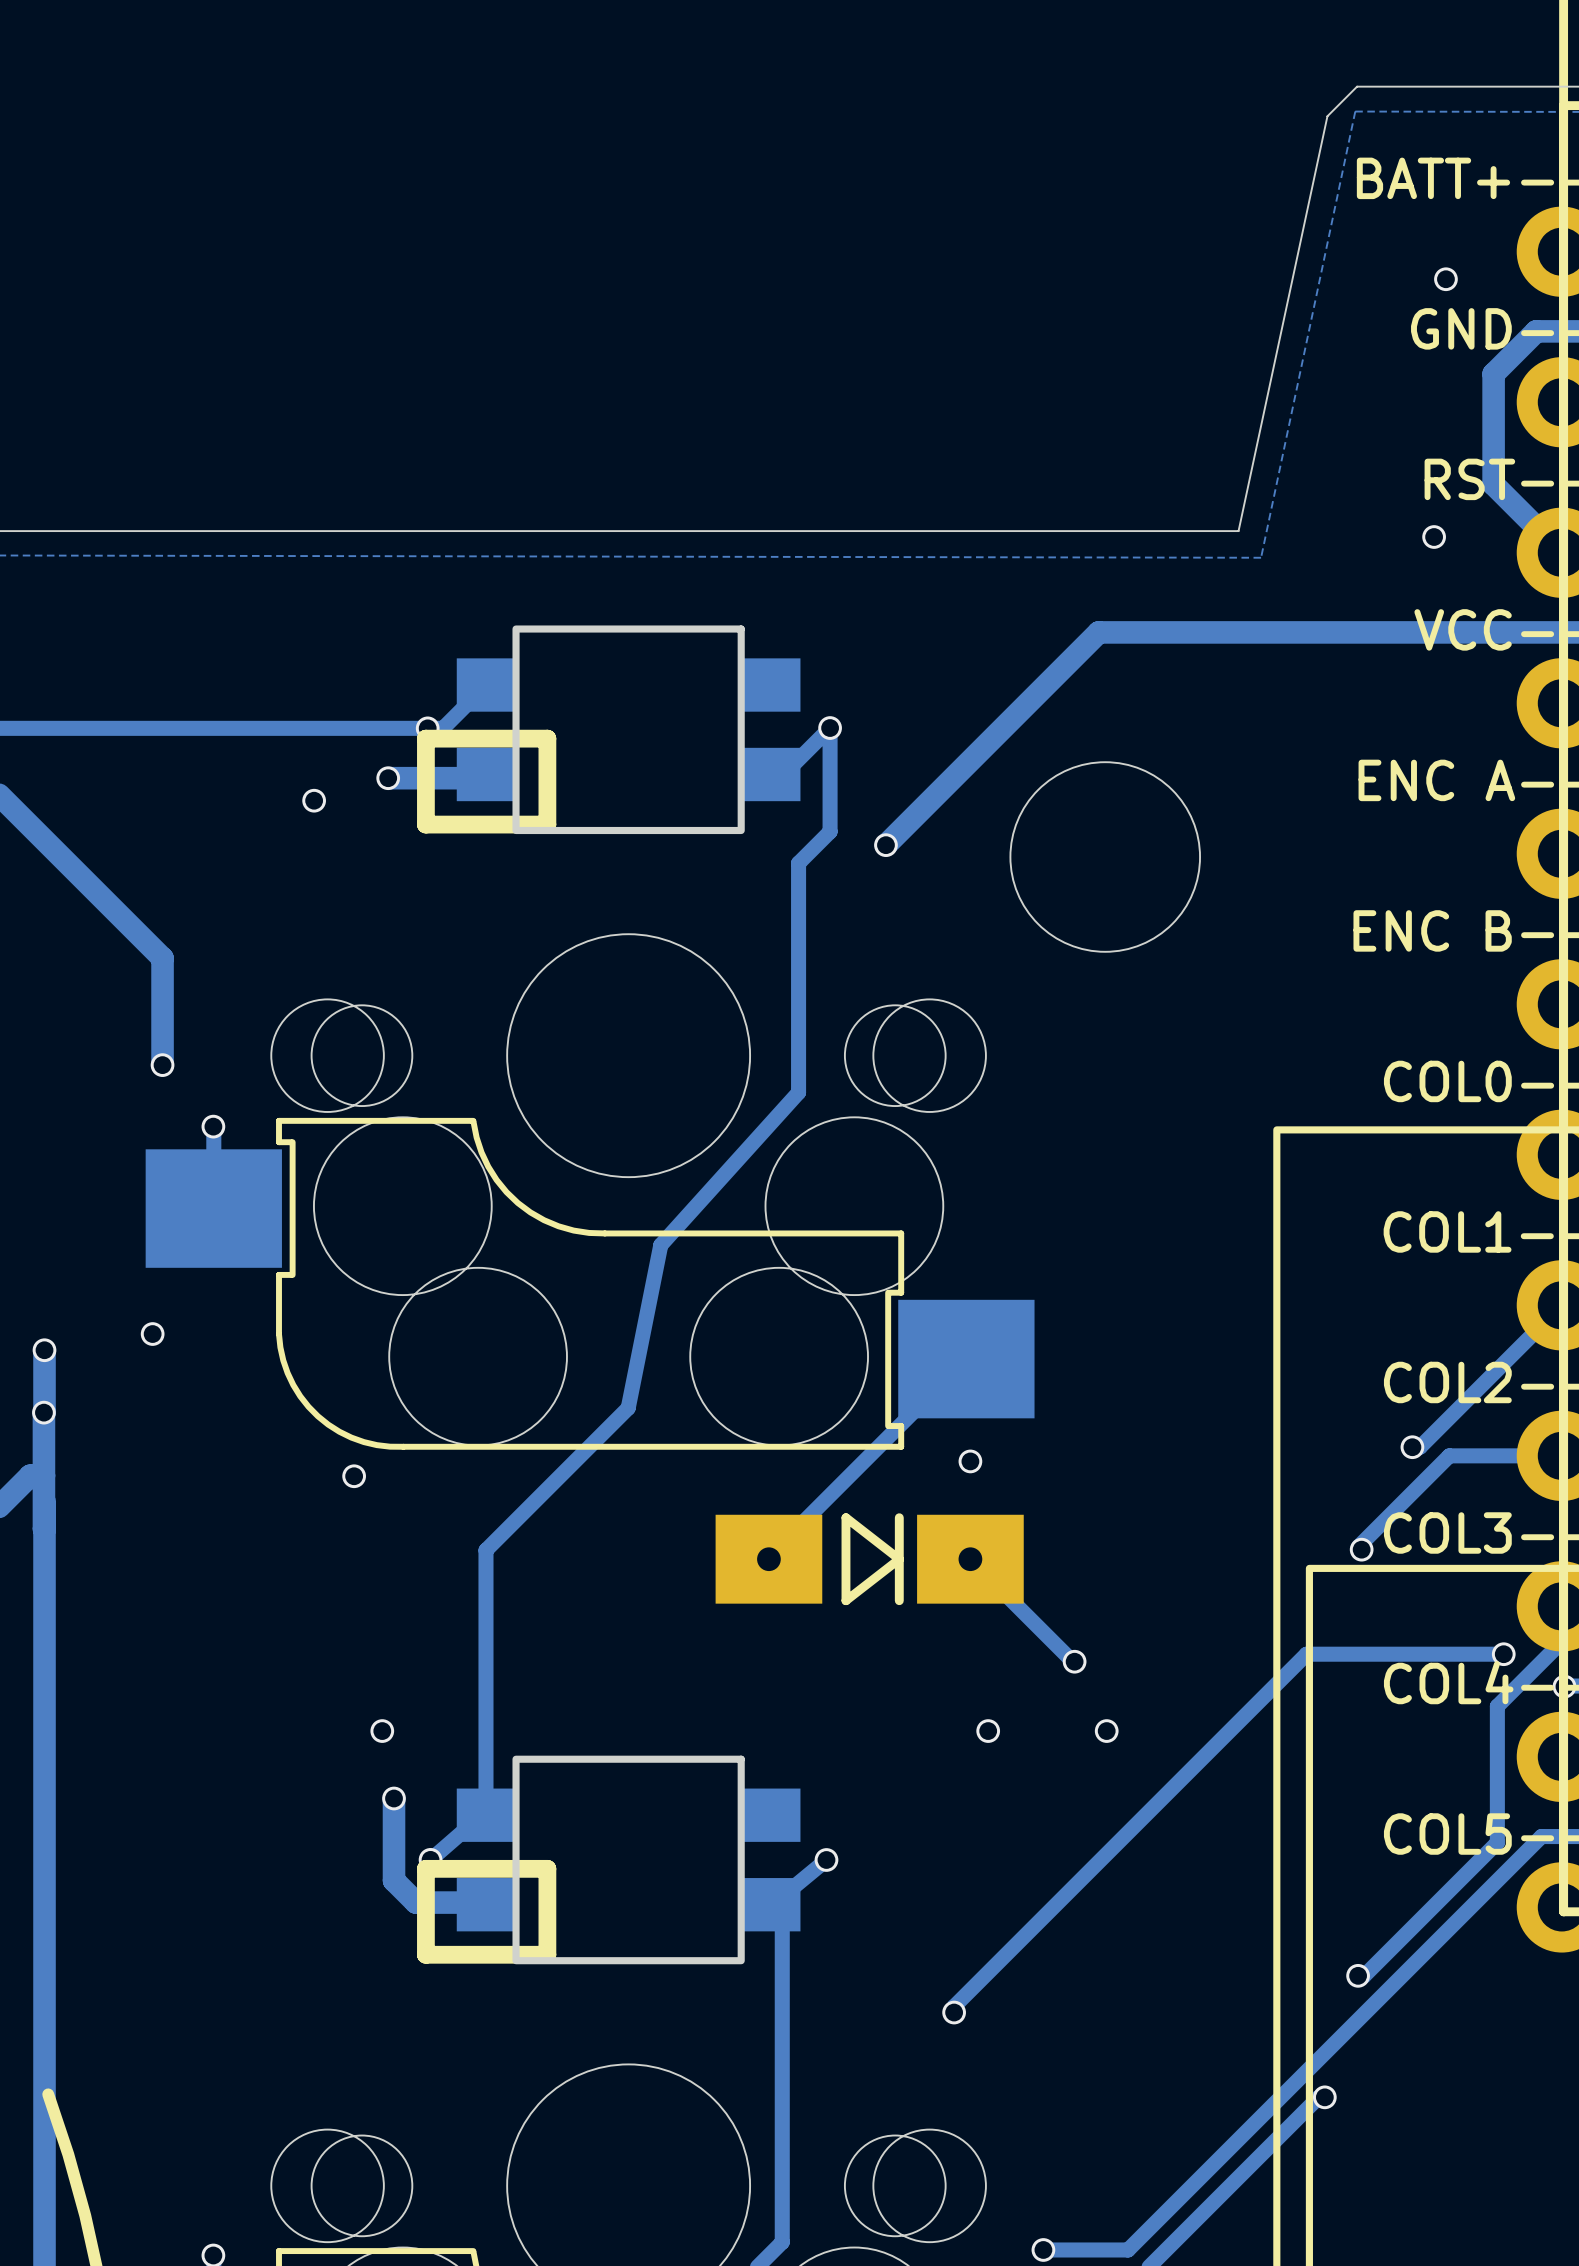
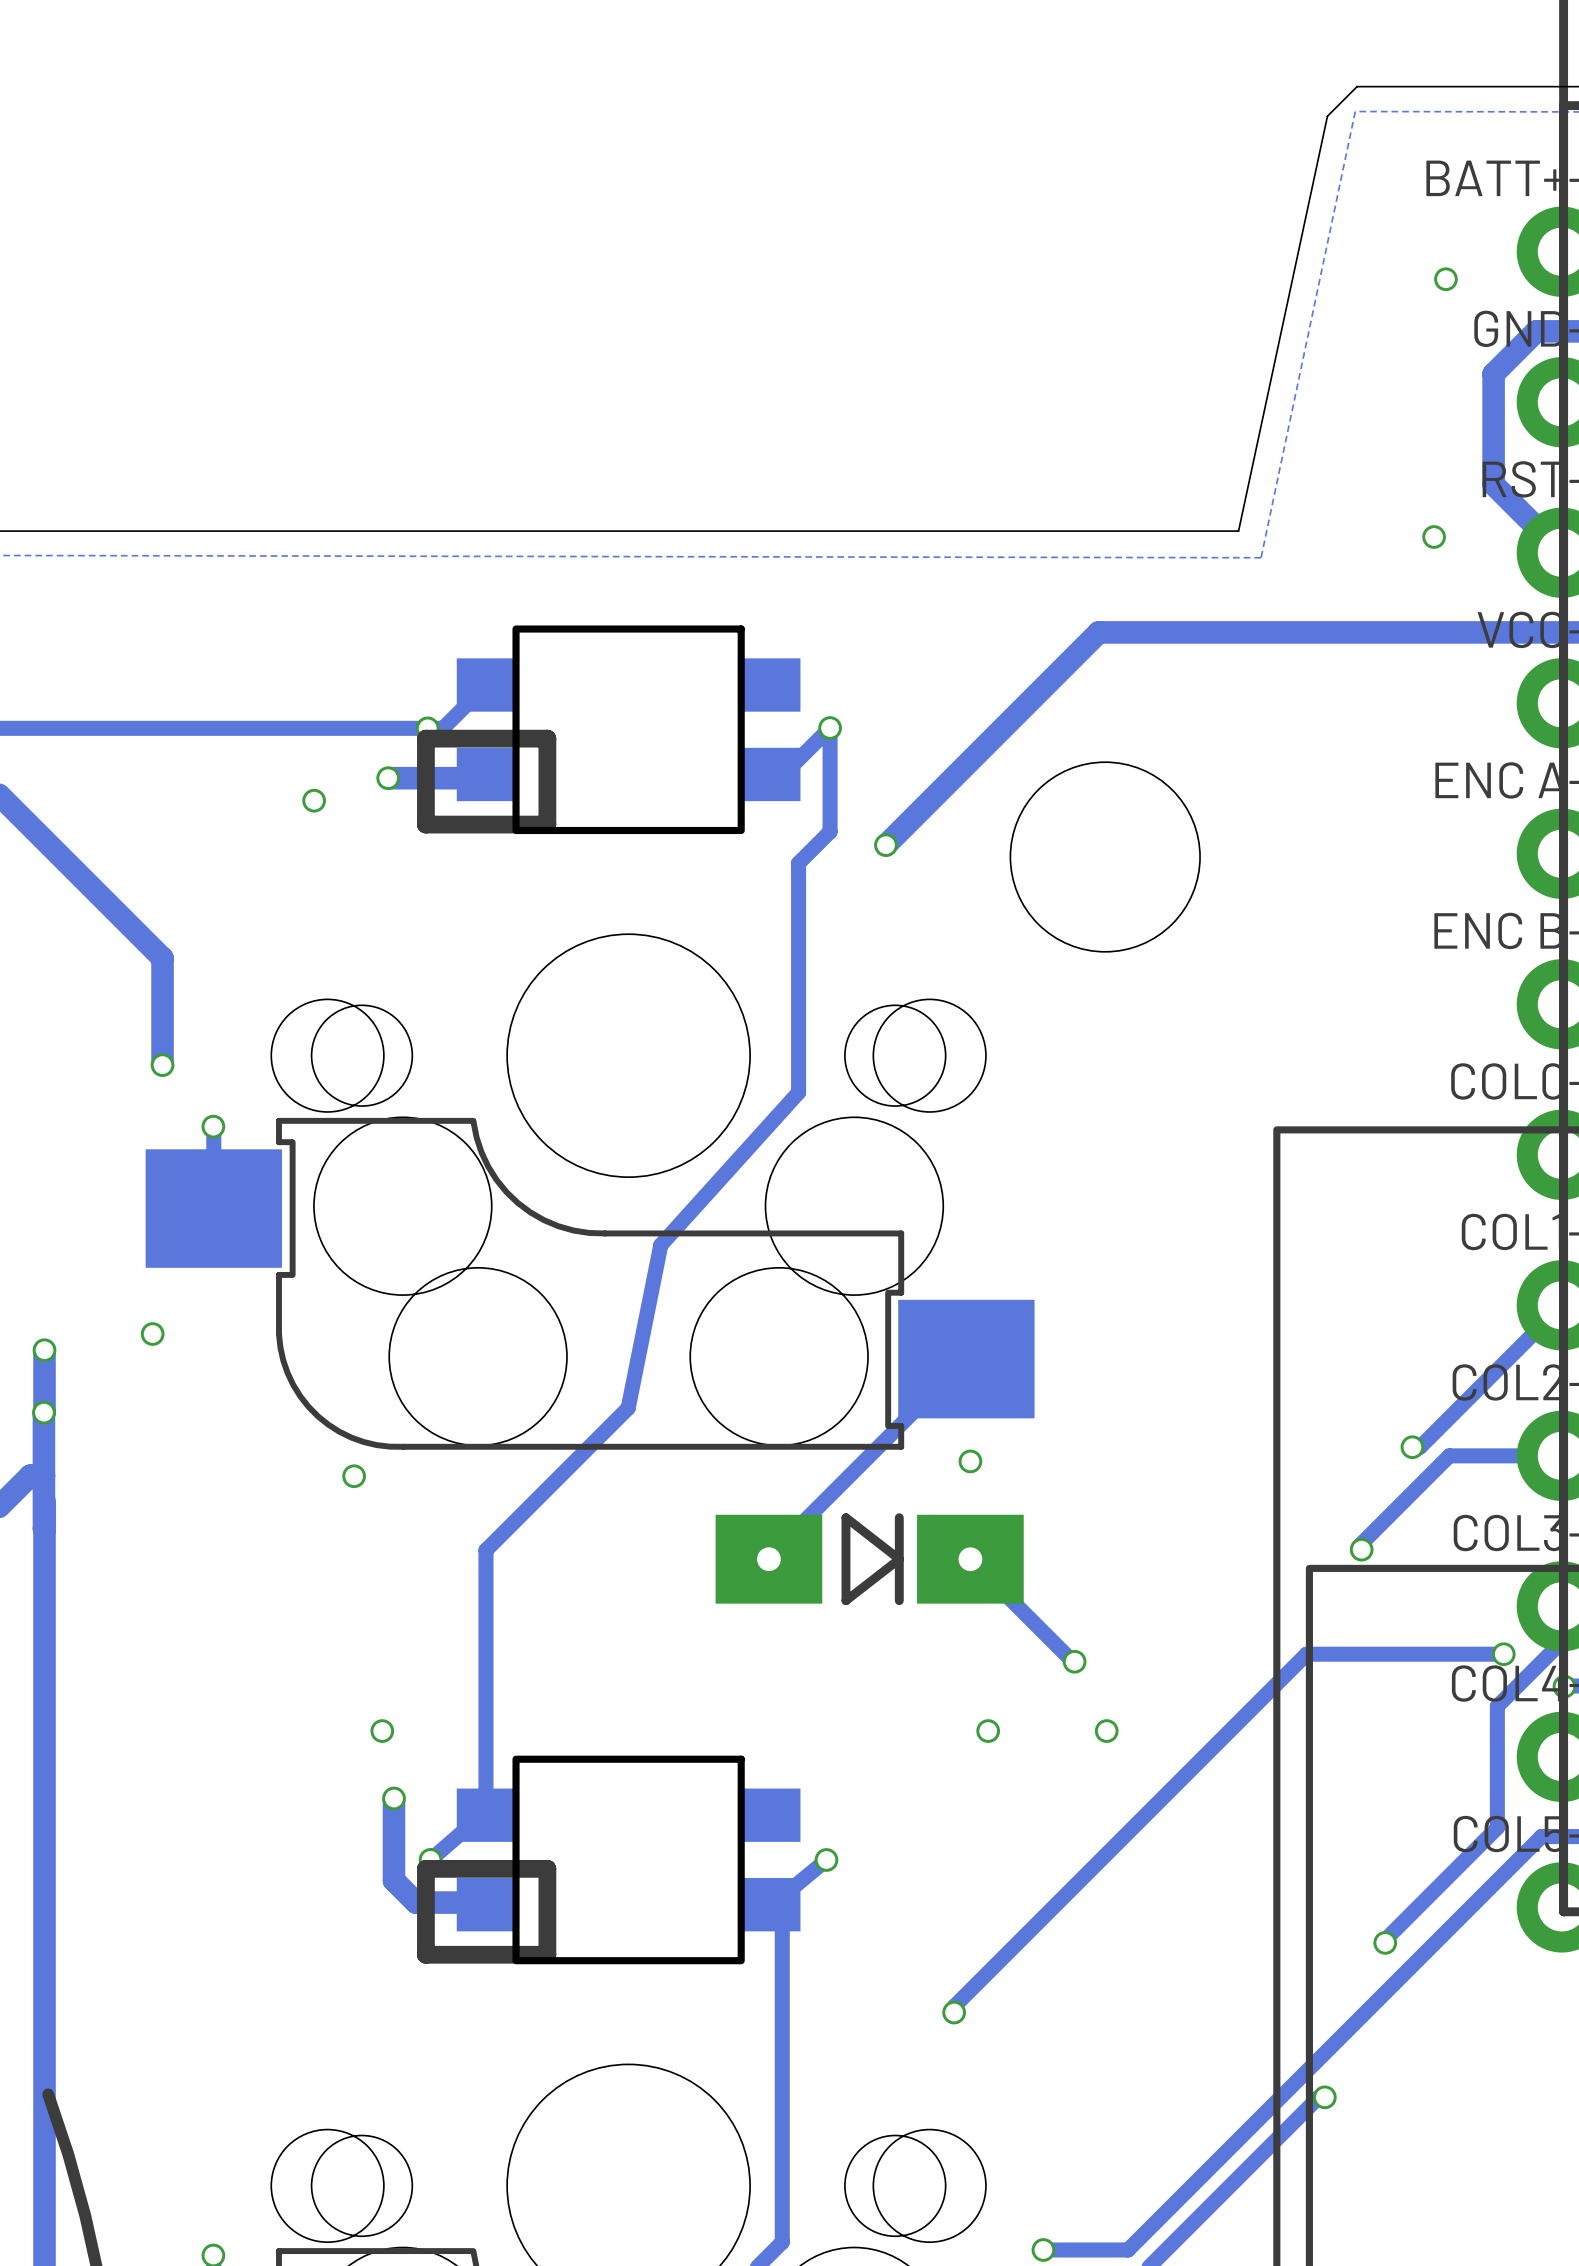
track: (1497, 1827) (1497, 1842) (1363, 1976) (1357, 1976) -> (1497, 1827) (1383, 1941)
via position: (1358, 1975) -> (1385, 1942)

